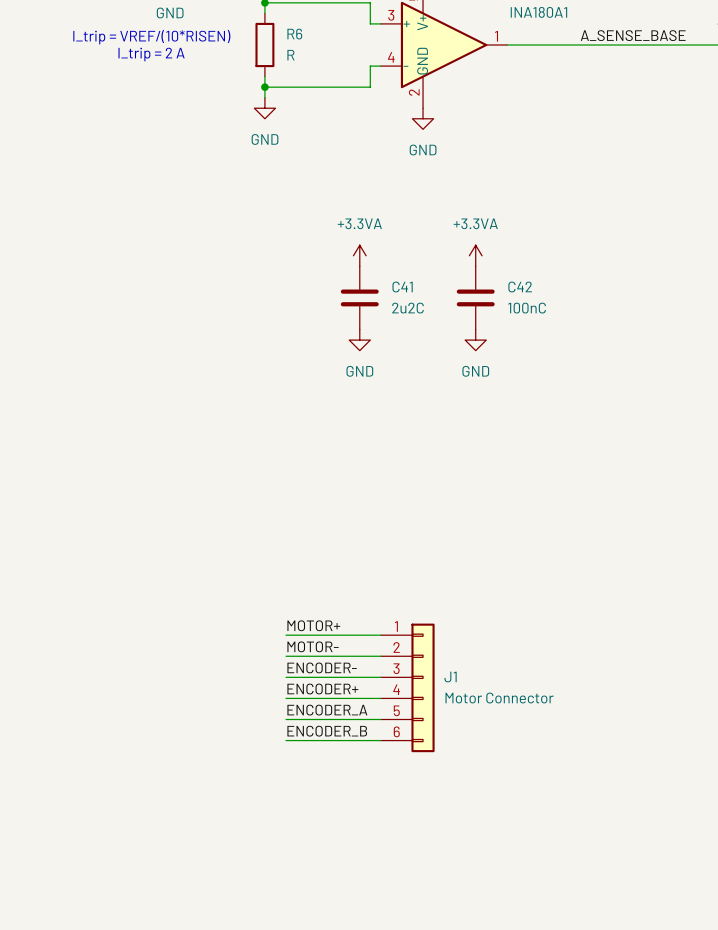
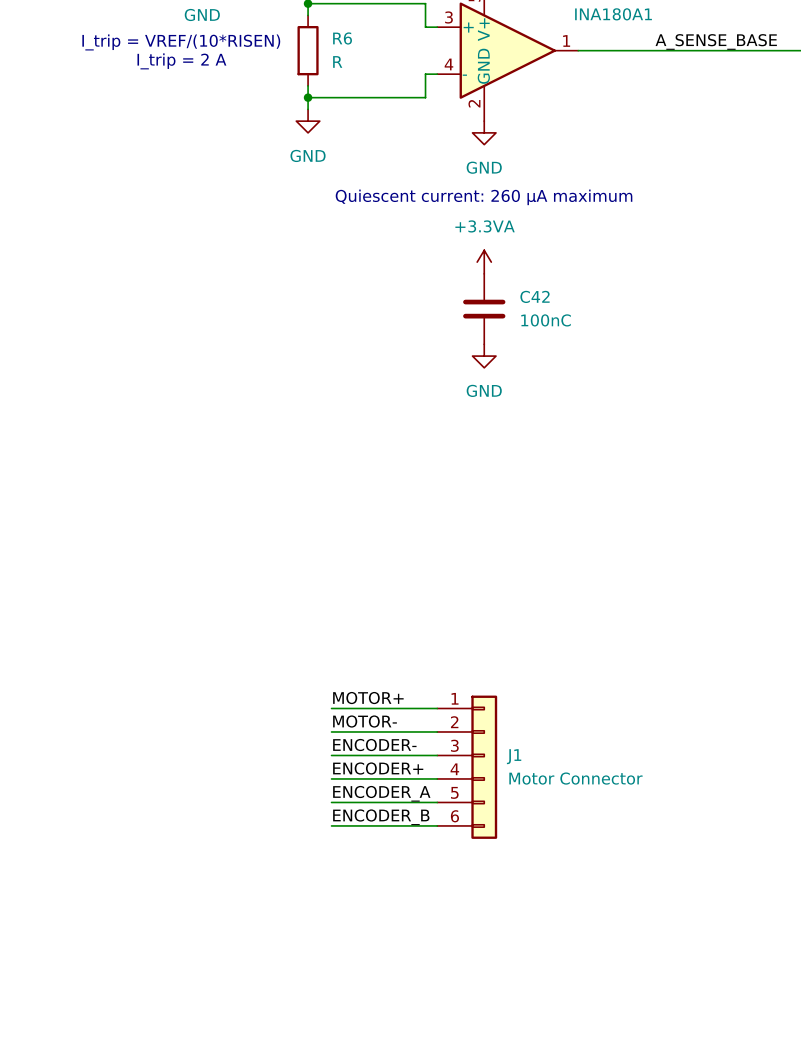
text: none -> Quiescent current: 260 µA maximum (484, 197)
power symbol: none -> +3.3VA (484, 262)
power symbol: +3.3VA (359, 255) -> none
power symbol: +3.3VA (475, 255) -> none
C41: 2u2C (359, 297) -> none
C42 position: (475, 297) -> (484, 309)
power symbol: none -> GND (484, 356)
power symbol: GND (359, 340) -> none
power symbol: GND (475, 340) -> none

